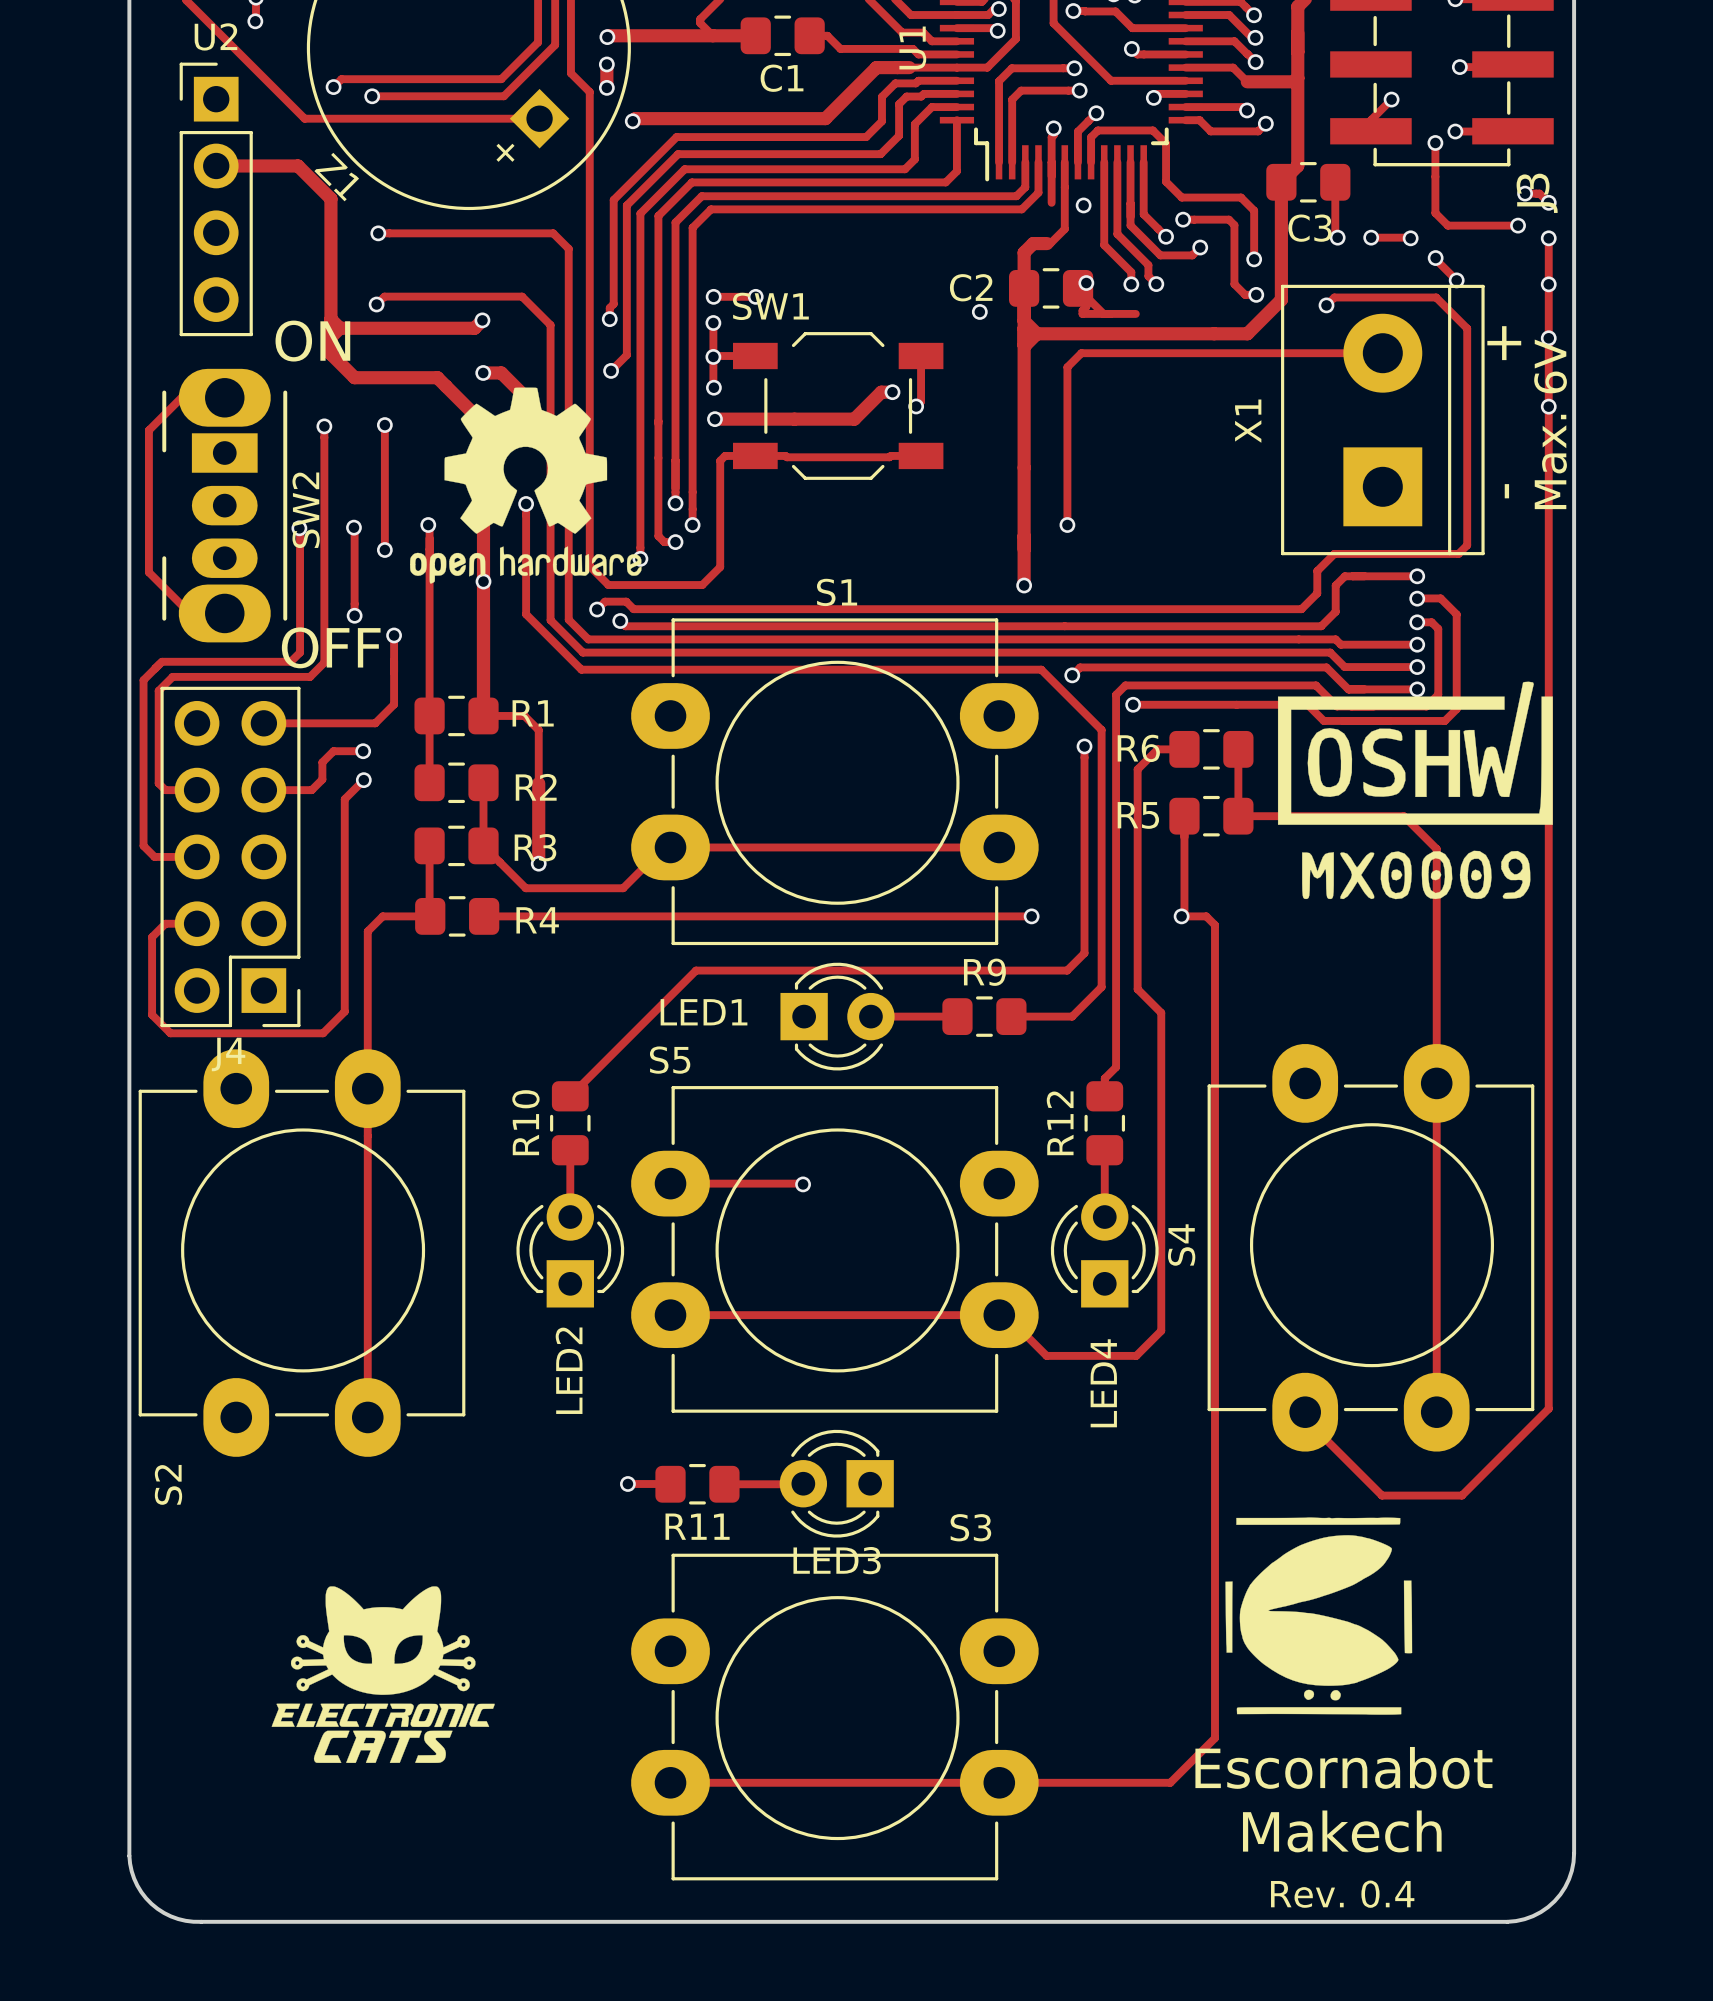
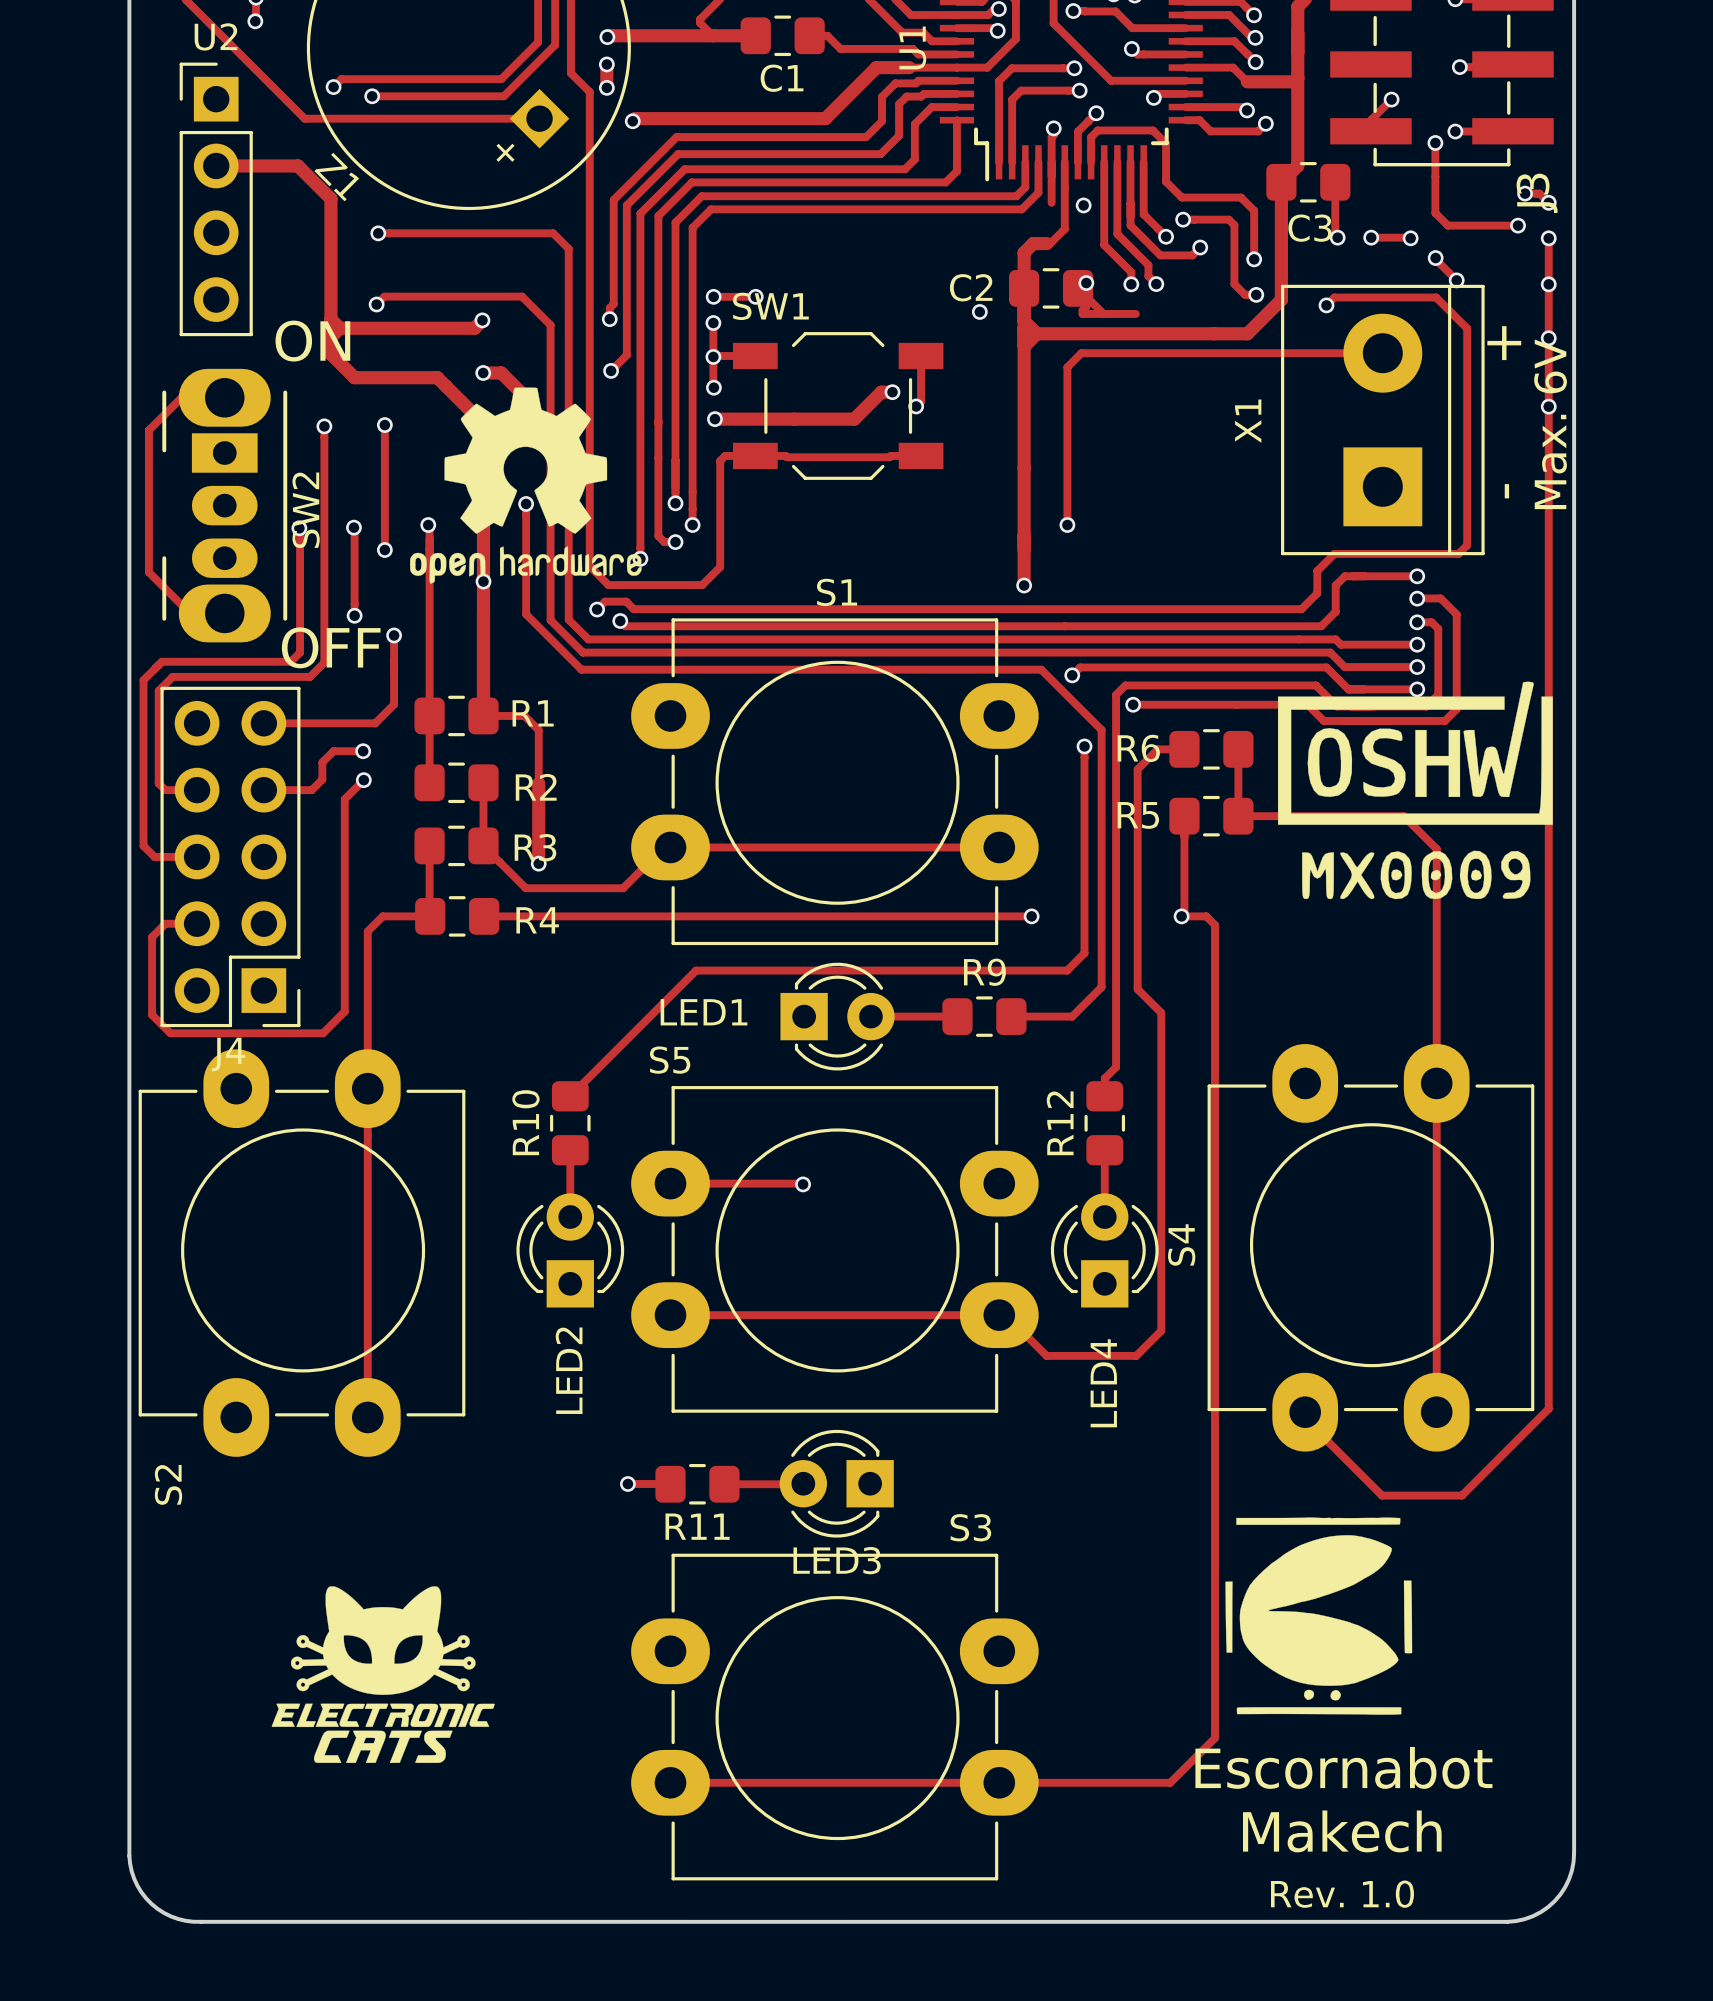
text: Rev. 0.4 (1342, 1894) -> Rev. 1.0 (1342, 1894)

